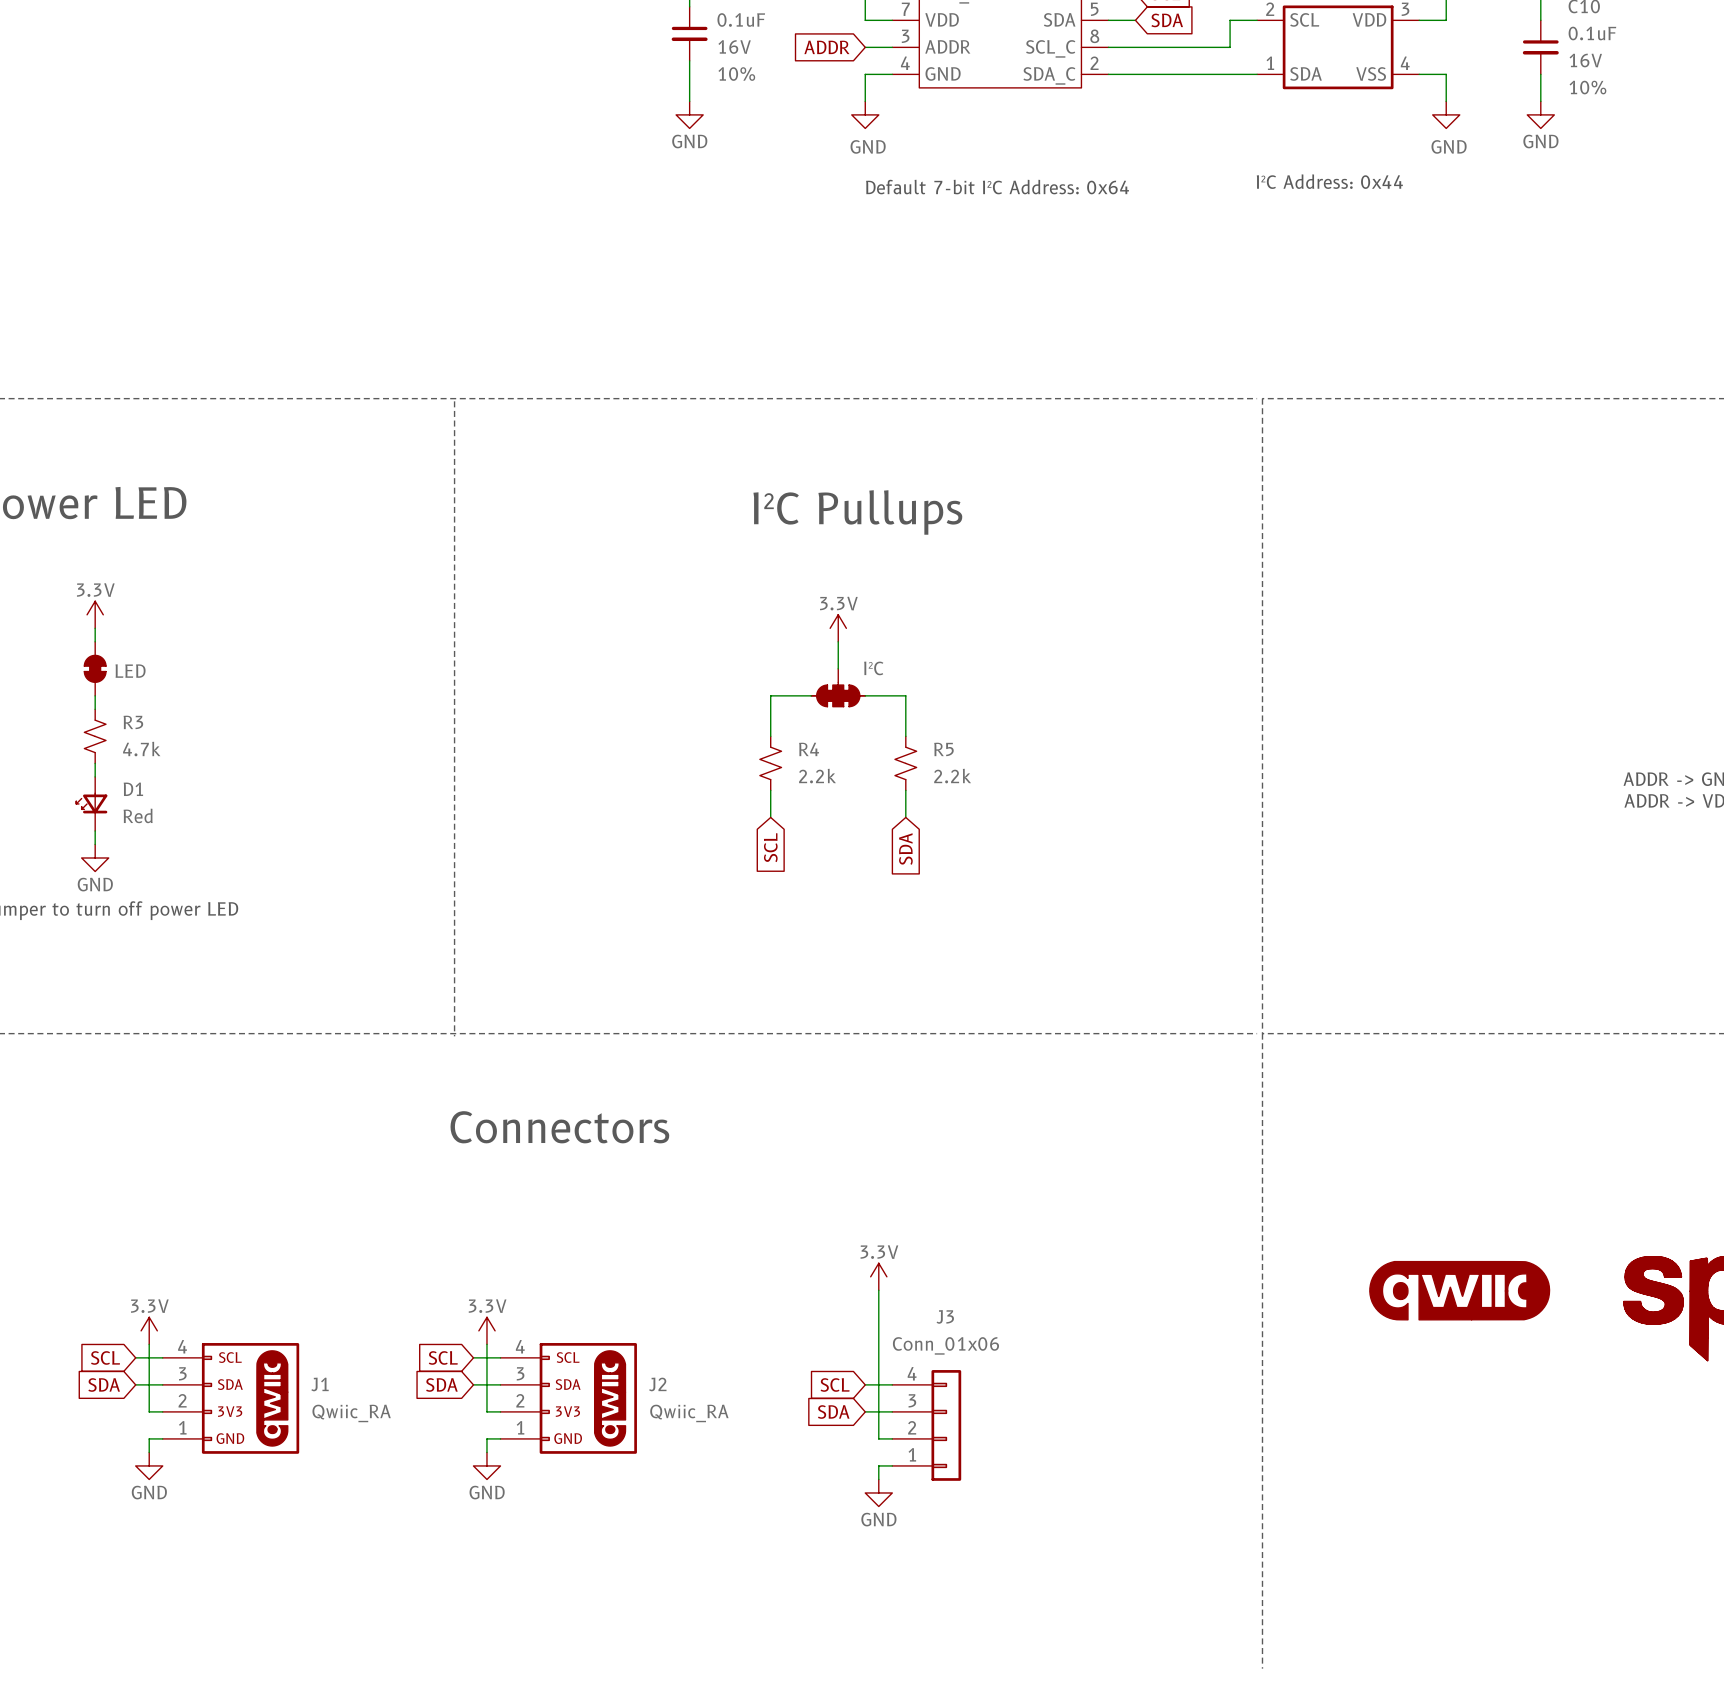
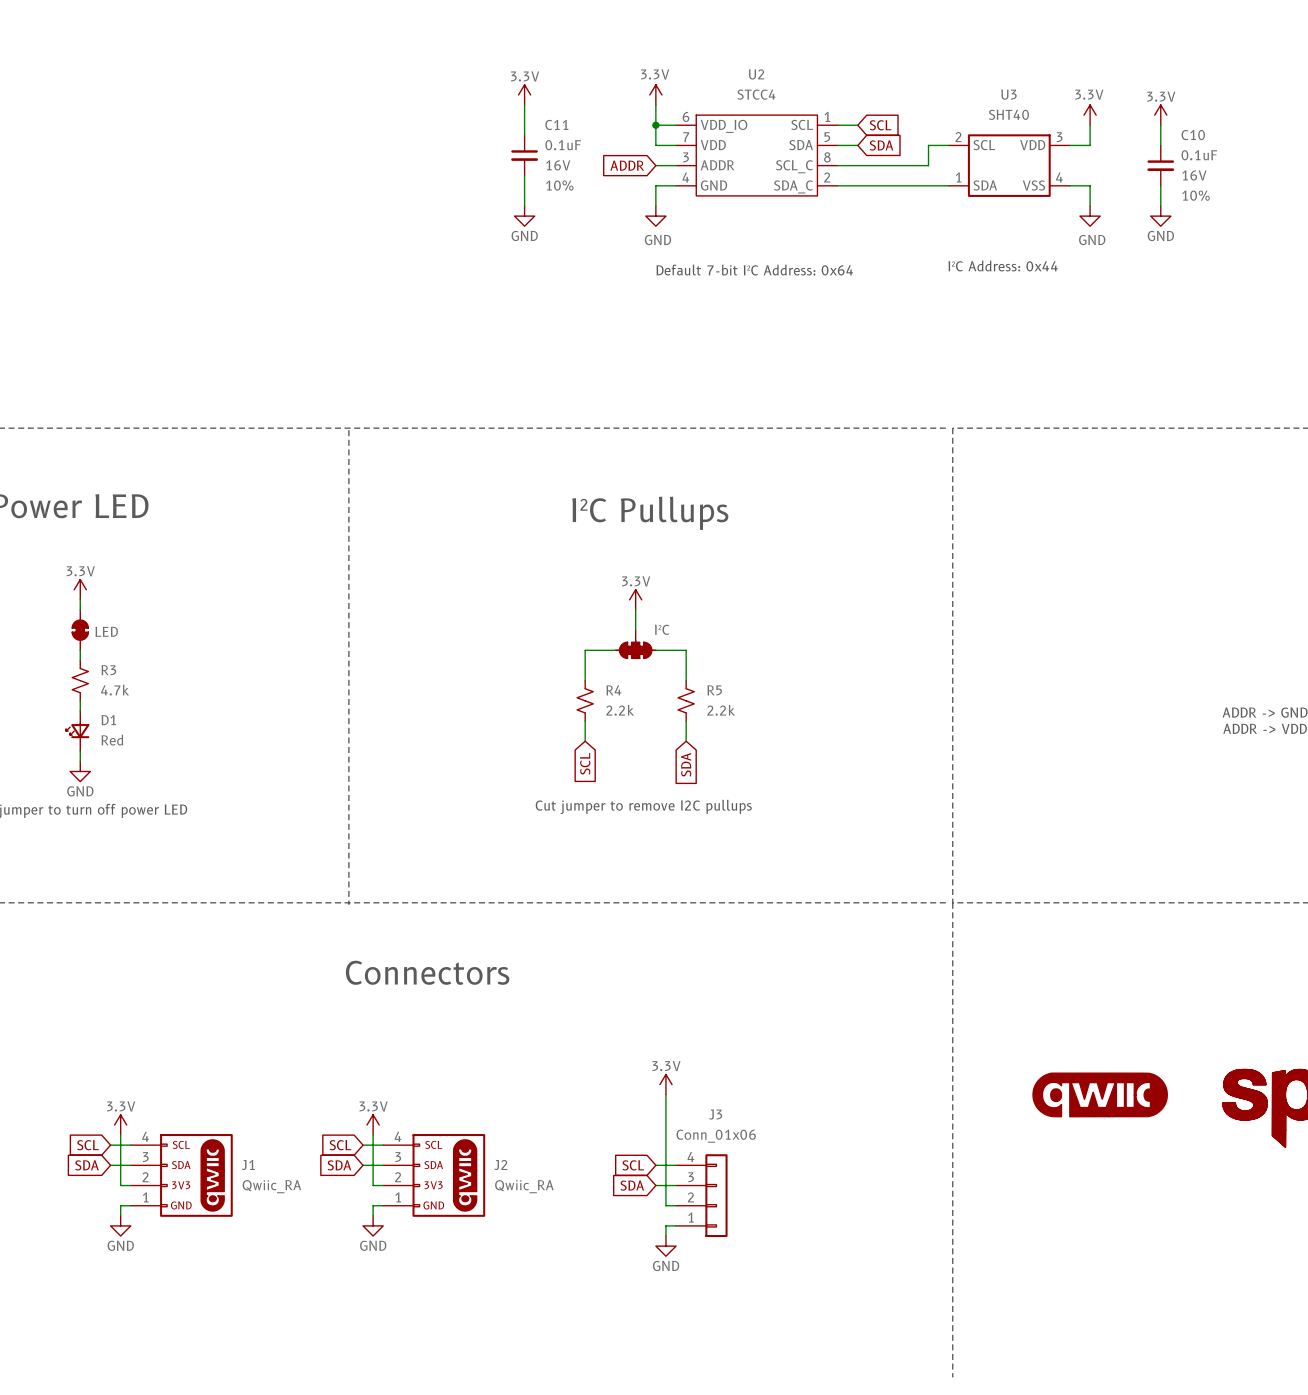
text: none -> Cut jumper to remove I2C pullups (643, 806)

